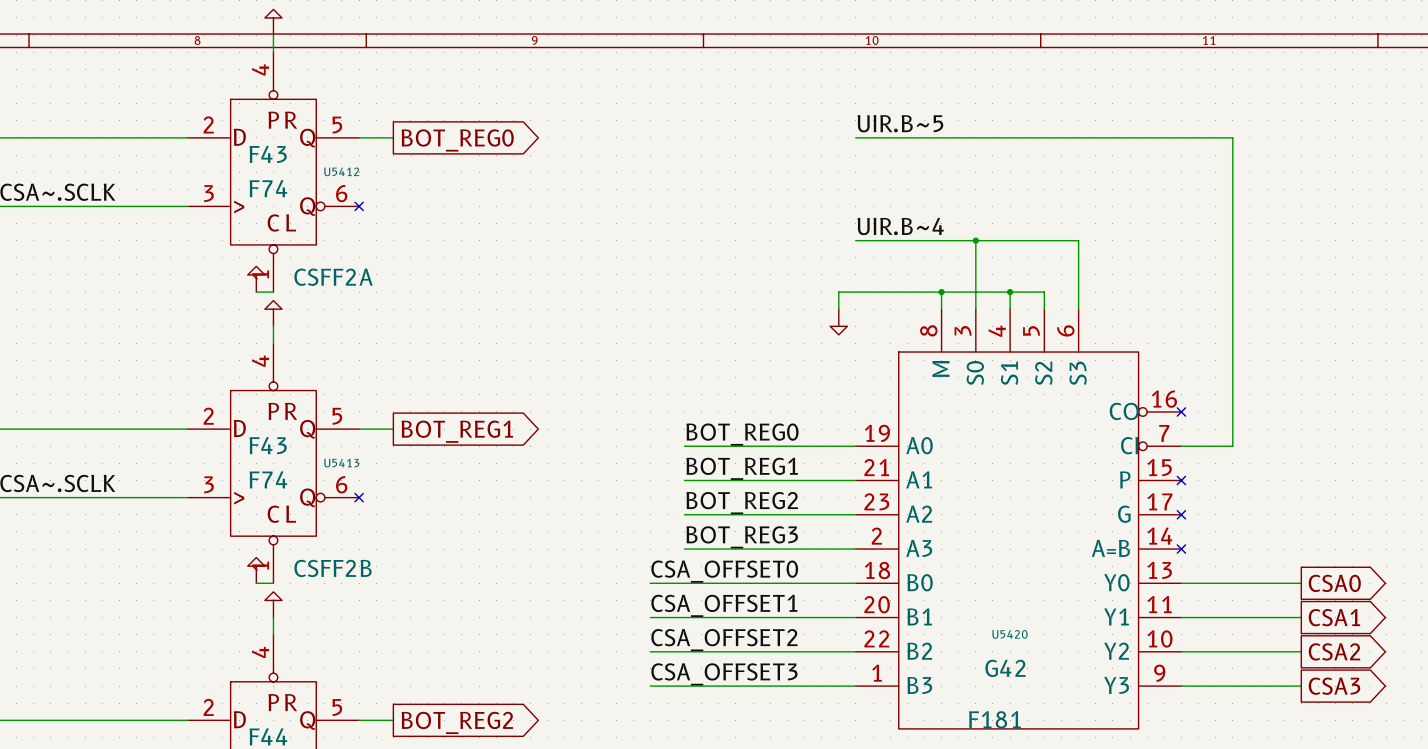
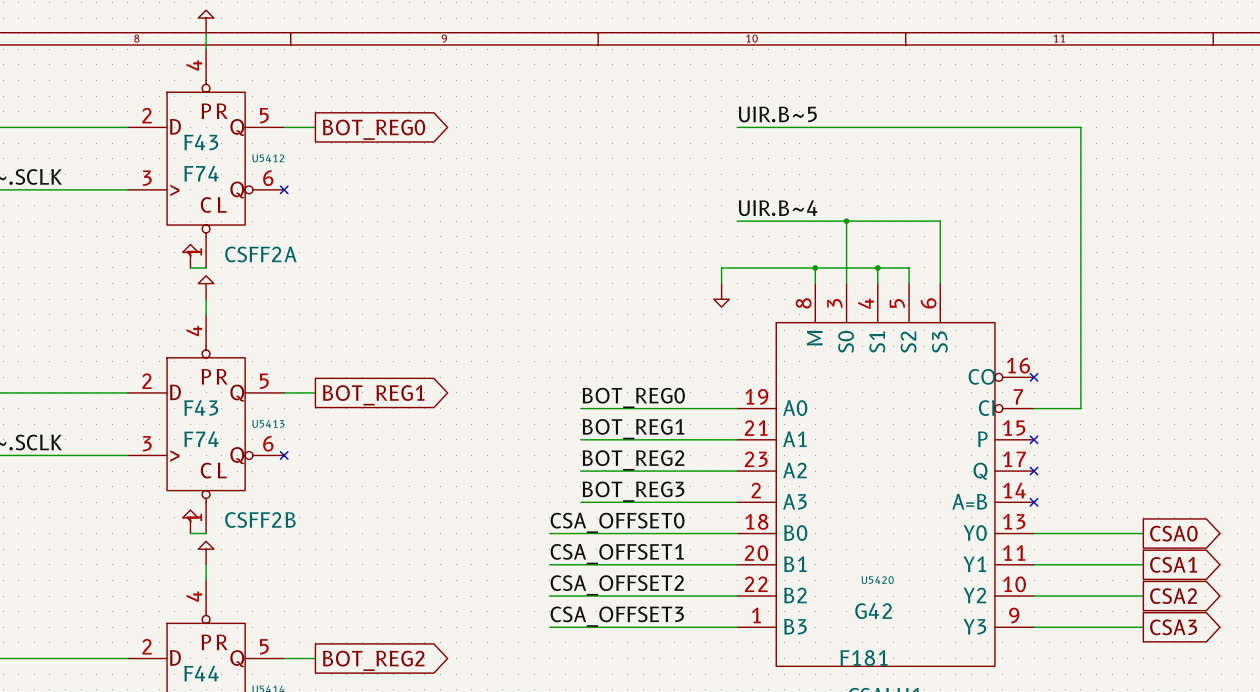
U5420 pin name: G (1124, 514) -> Q (980, 471)

